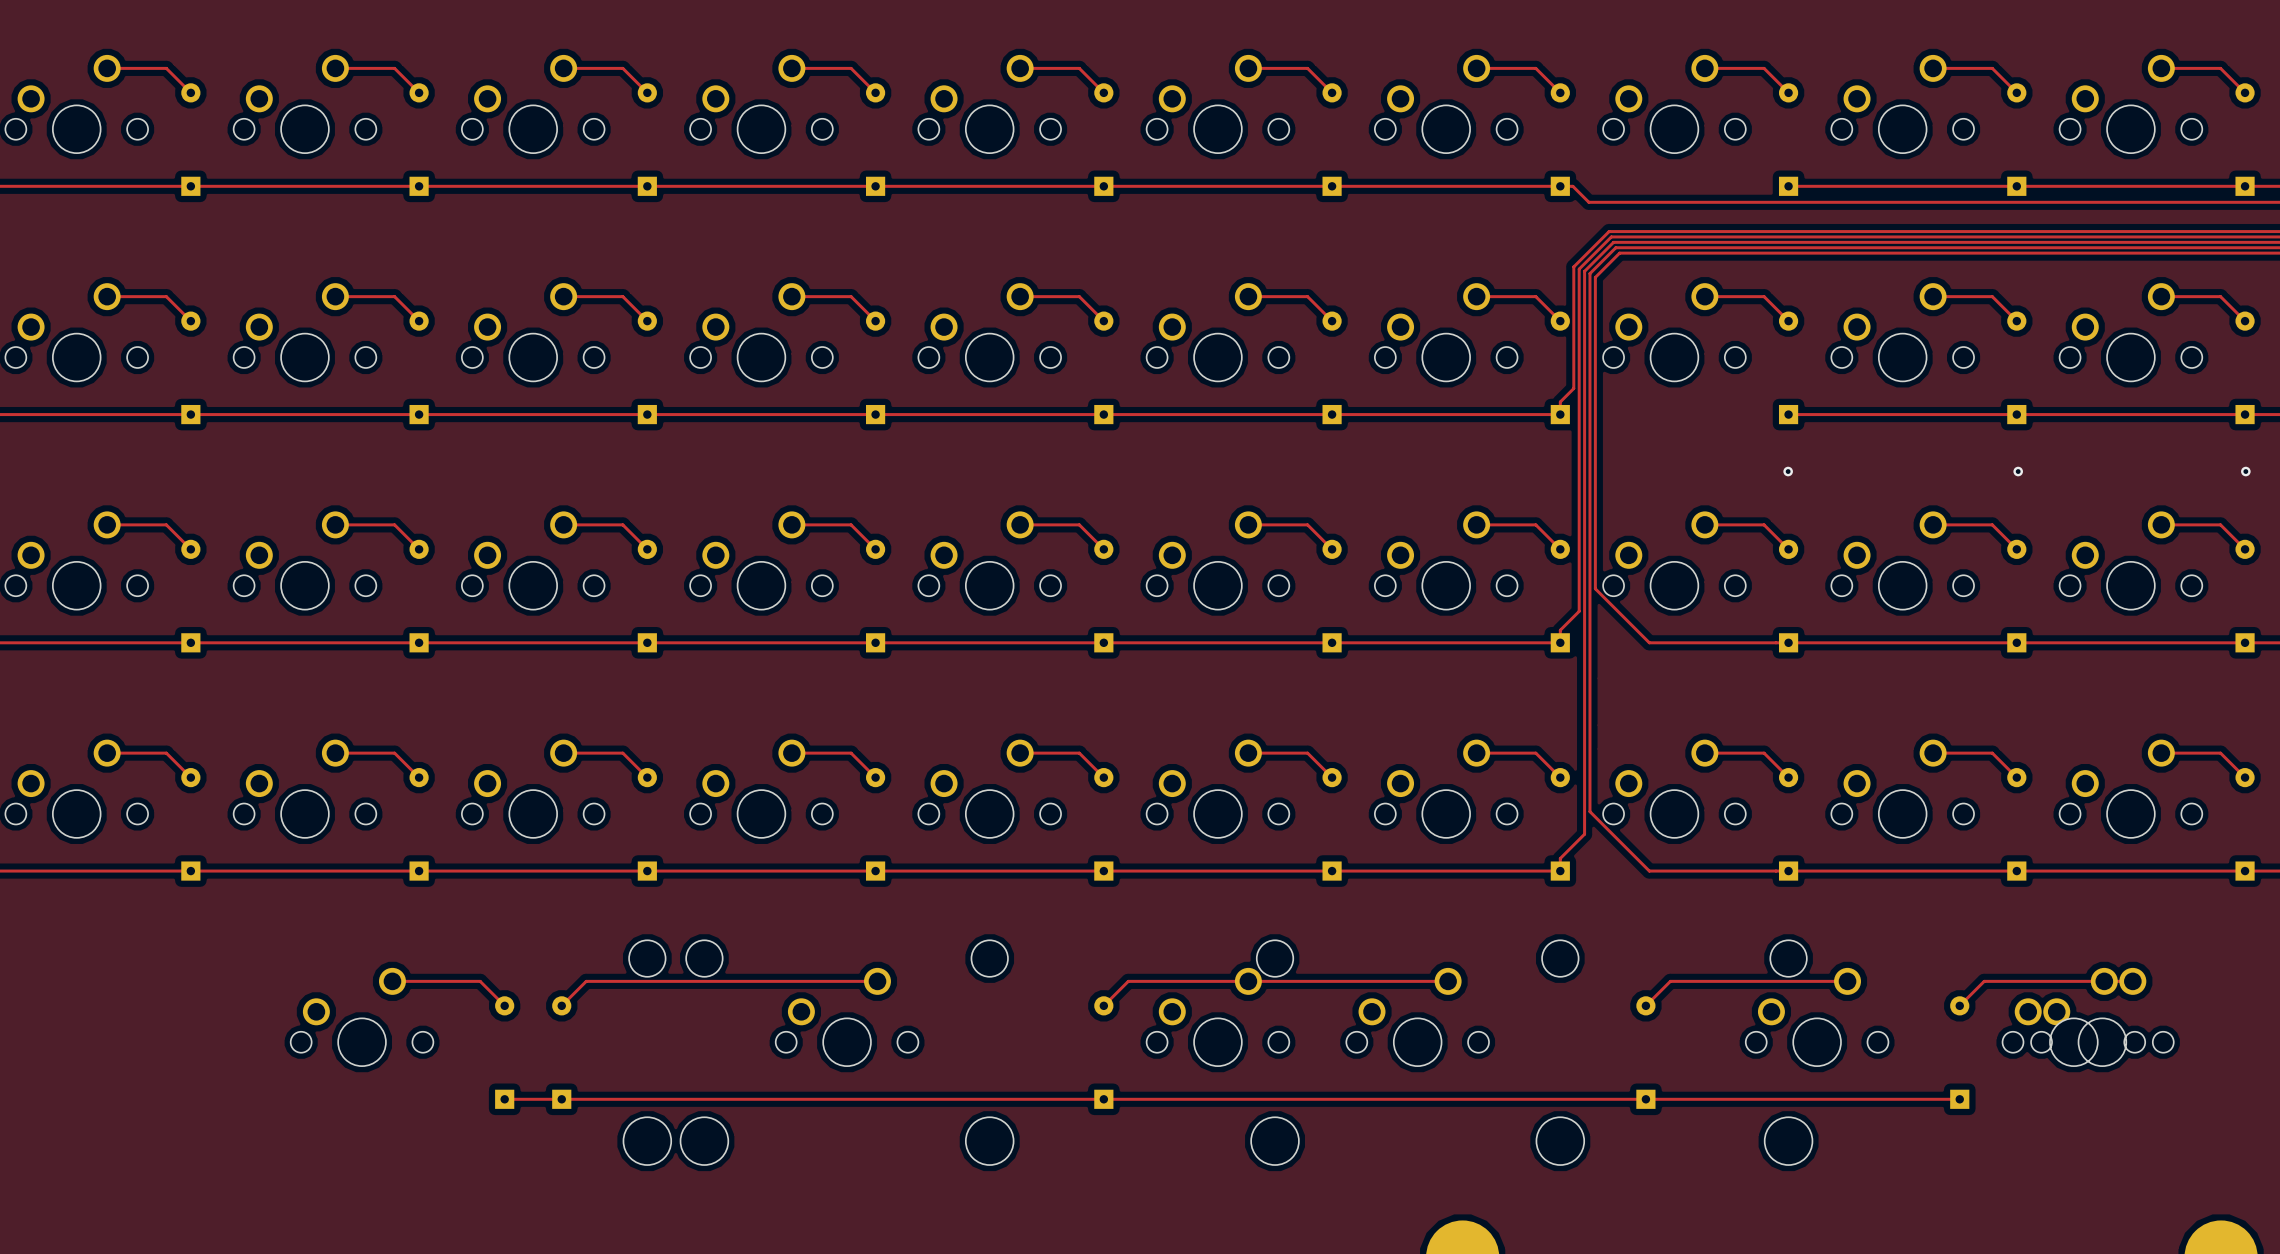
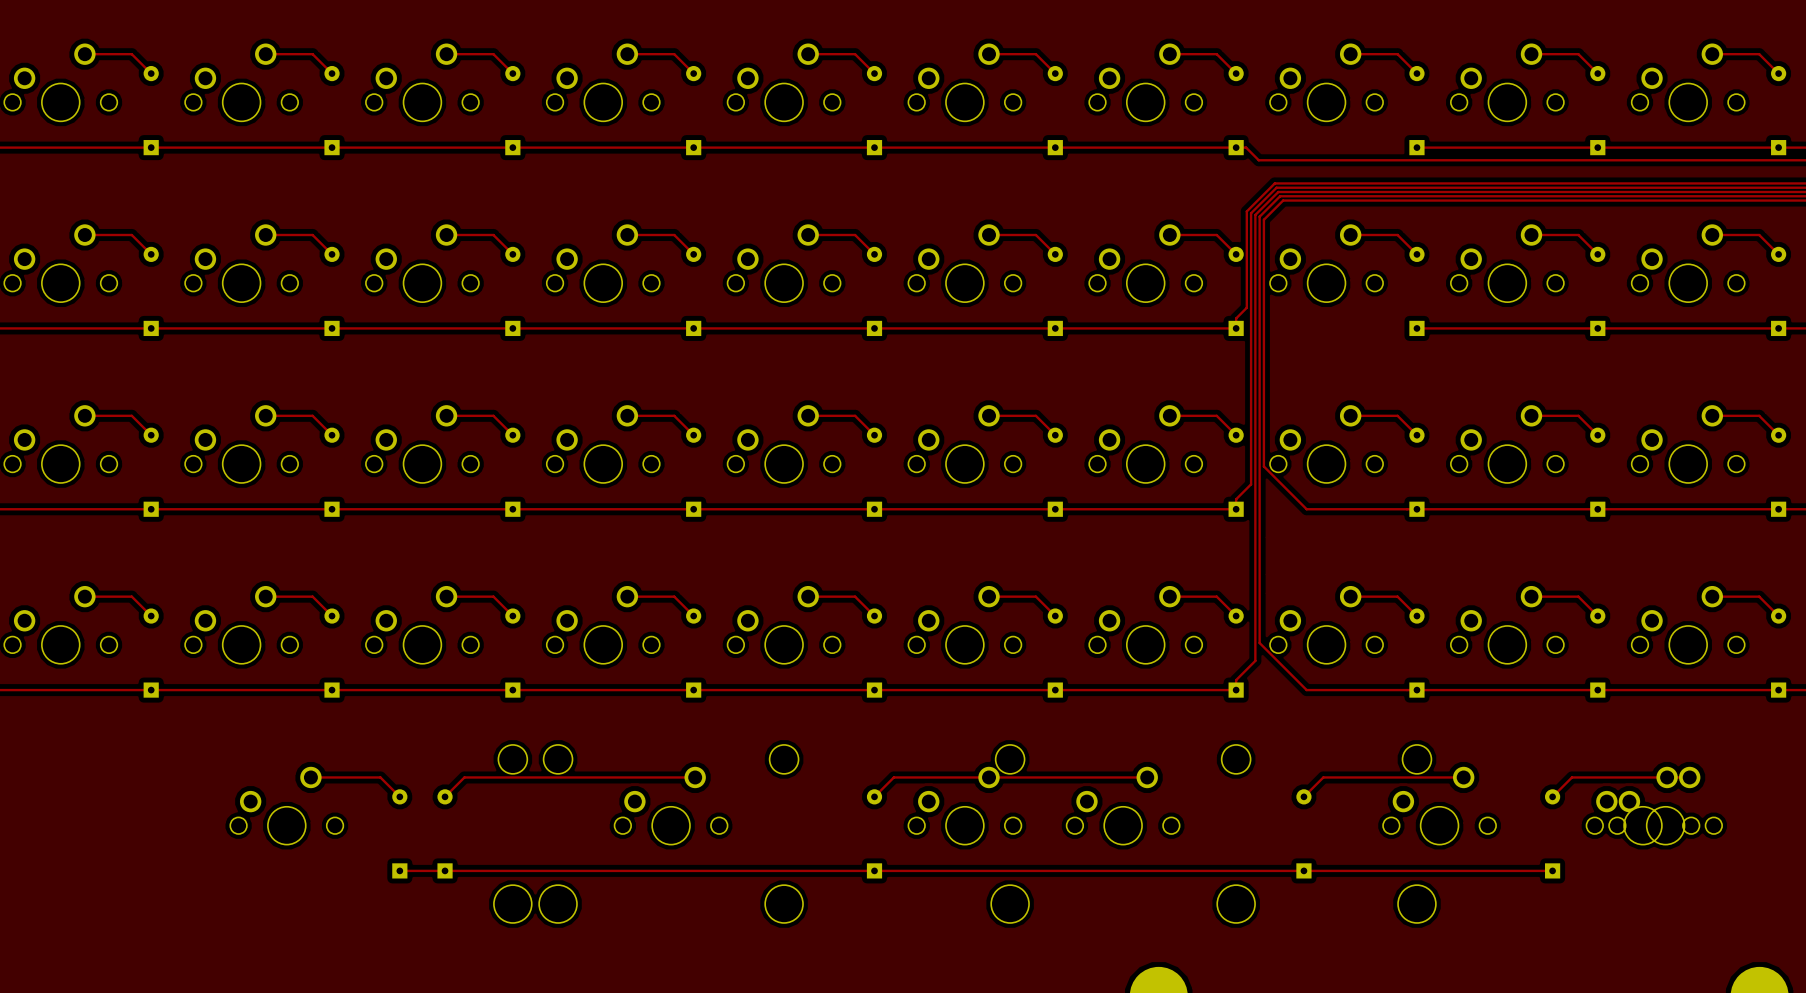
via: (1788, 471) -> none
via: (2018, 471) -> none
via: (2245, 471) -> none

